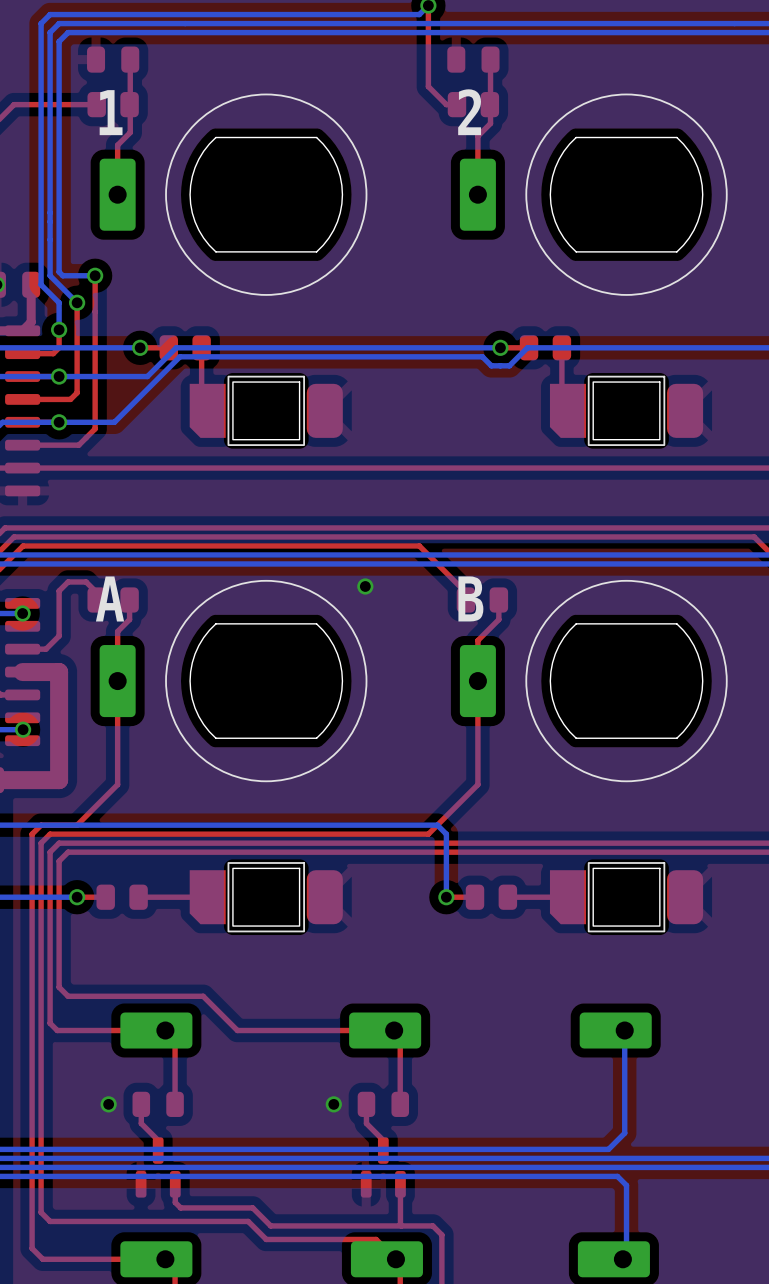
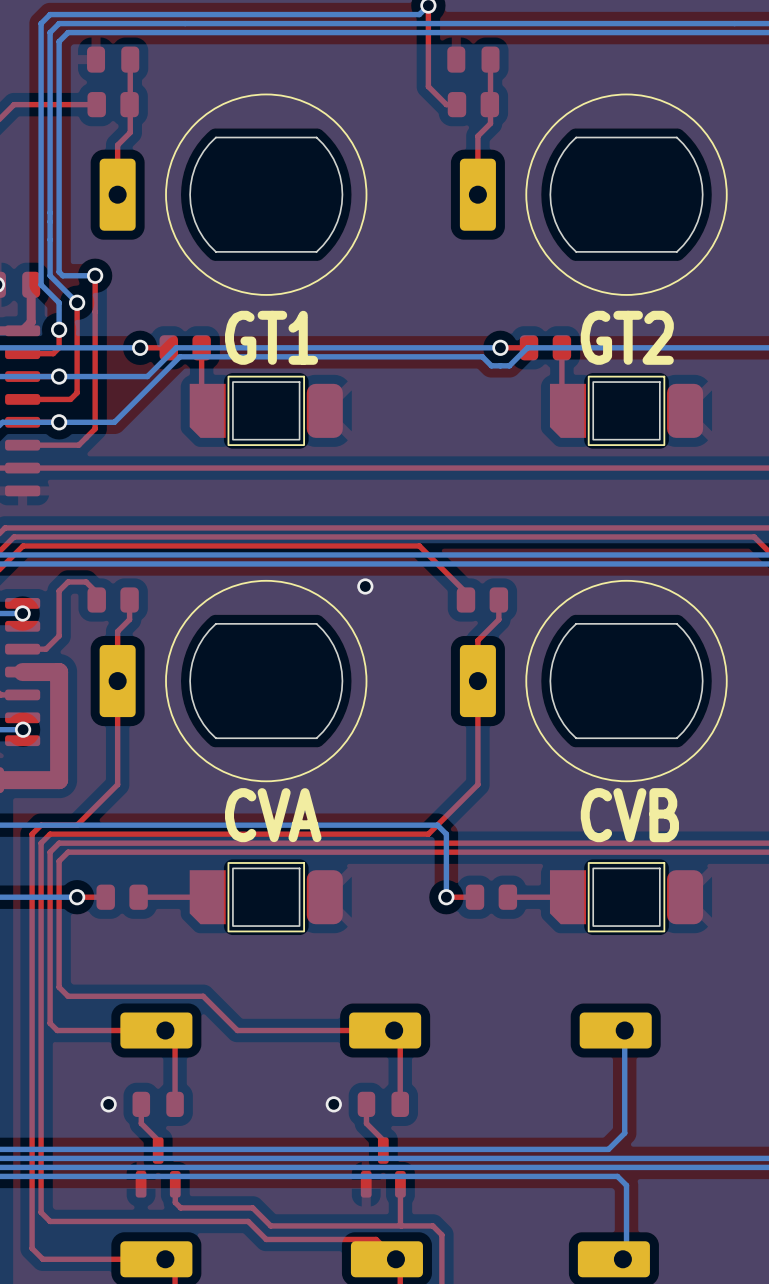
text: 1 (111, 112) -> none
text: 2 (469, 112) -> none
text: none -> GT1 (271, 337)
text: none -> GT2 (627, 337)
text: A (110, 598) -> none
text: B (470, 598) -> none
text: none -> CVA (273, 815)
text: none -> CVB (629, 815)

